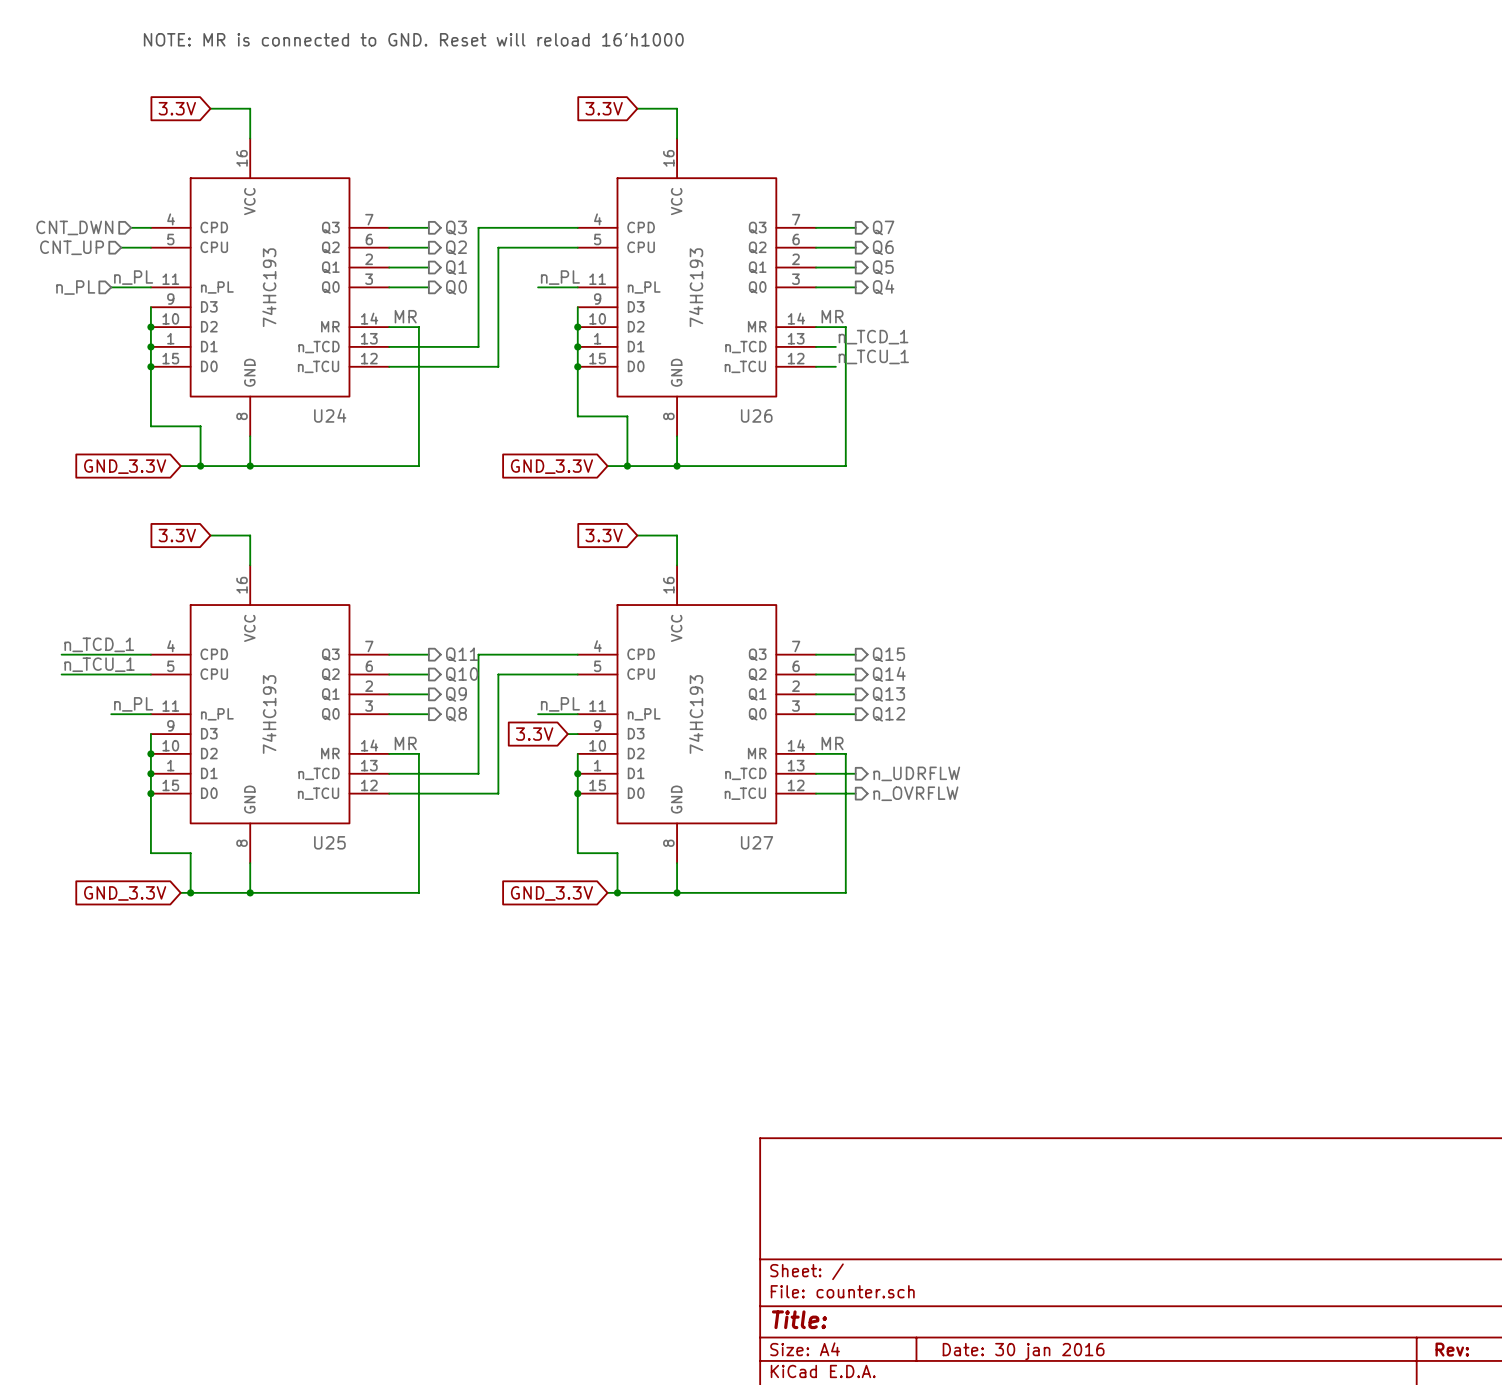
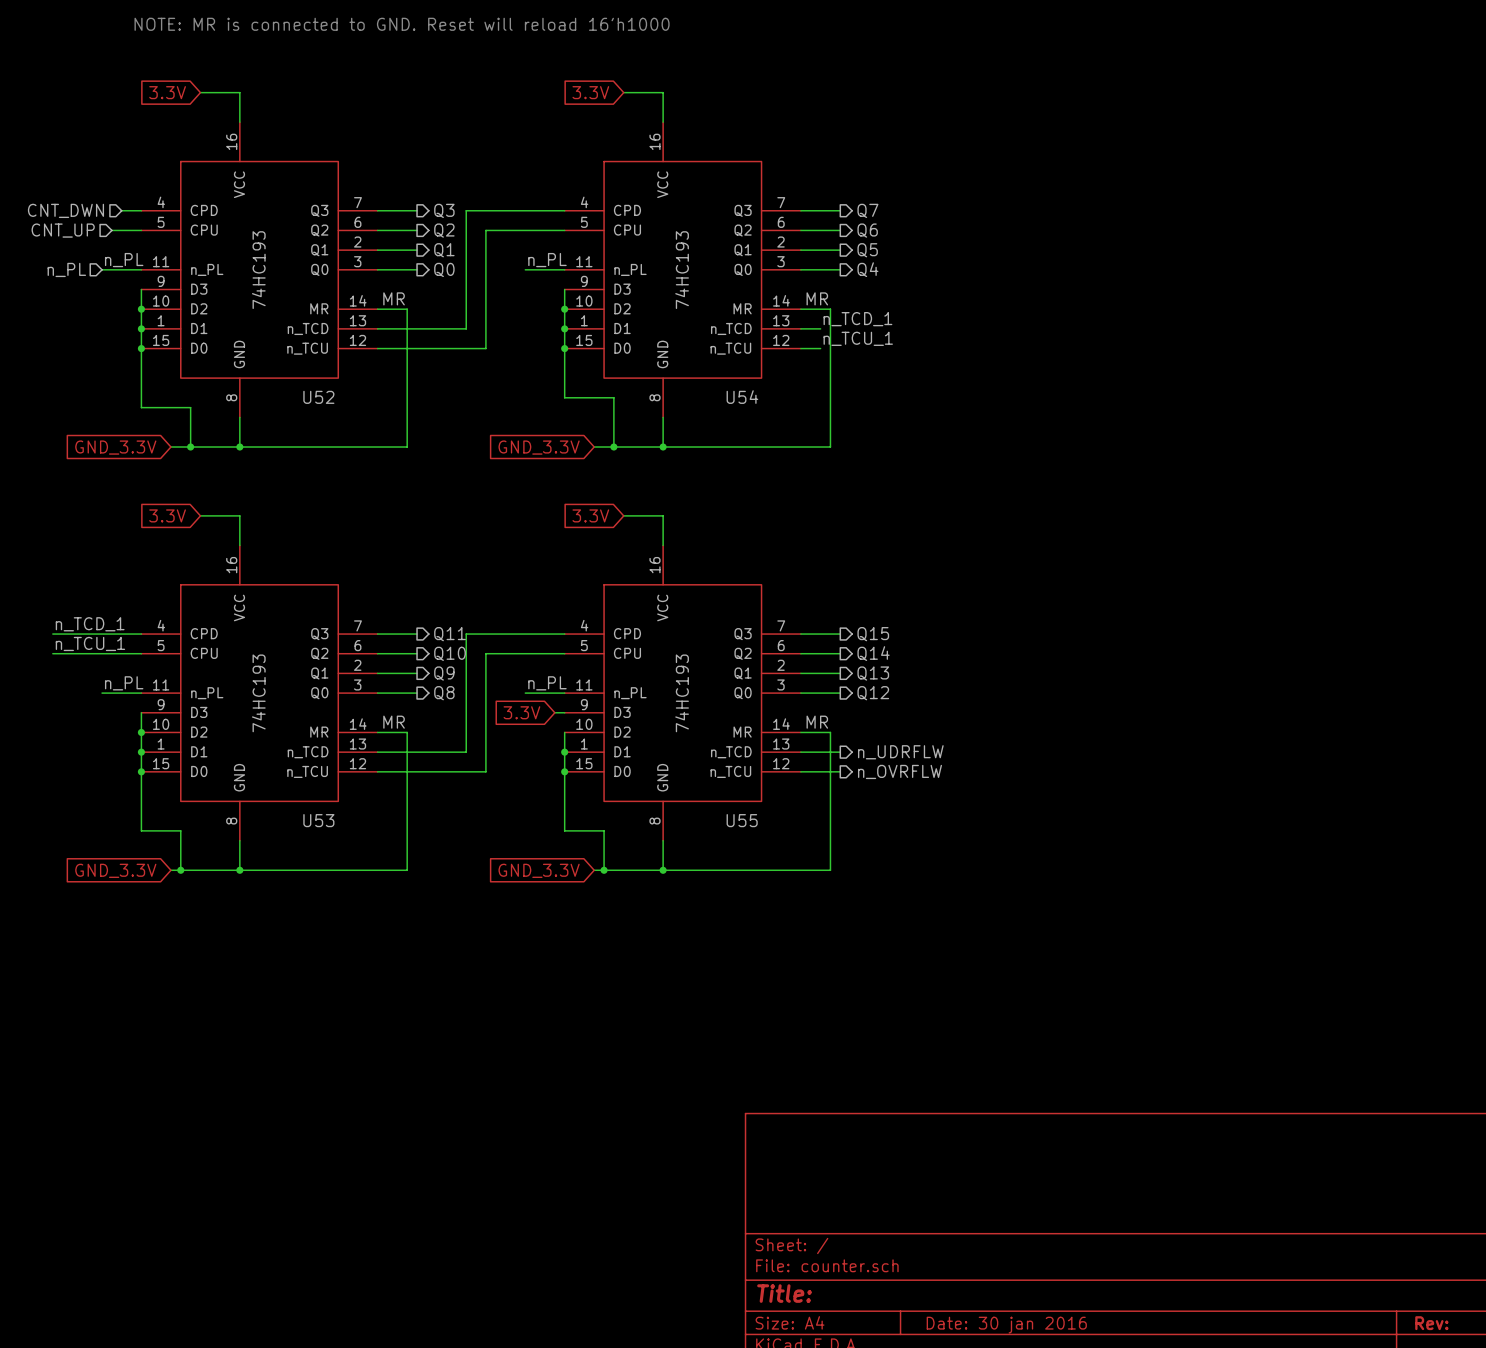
U24 name: U24 (330, 415) -> U52 (318, 397)
U26 name: U26 (756, 415) -> U54 (742, 397)
U25 name: U25 (329, 842) -> U53 (318, 820)
U27 name: U27 (757, 842) -> U55 (742, 820)

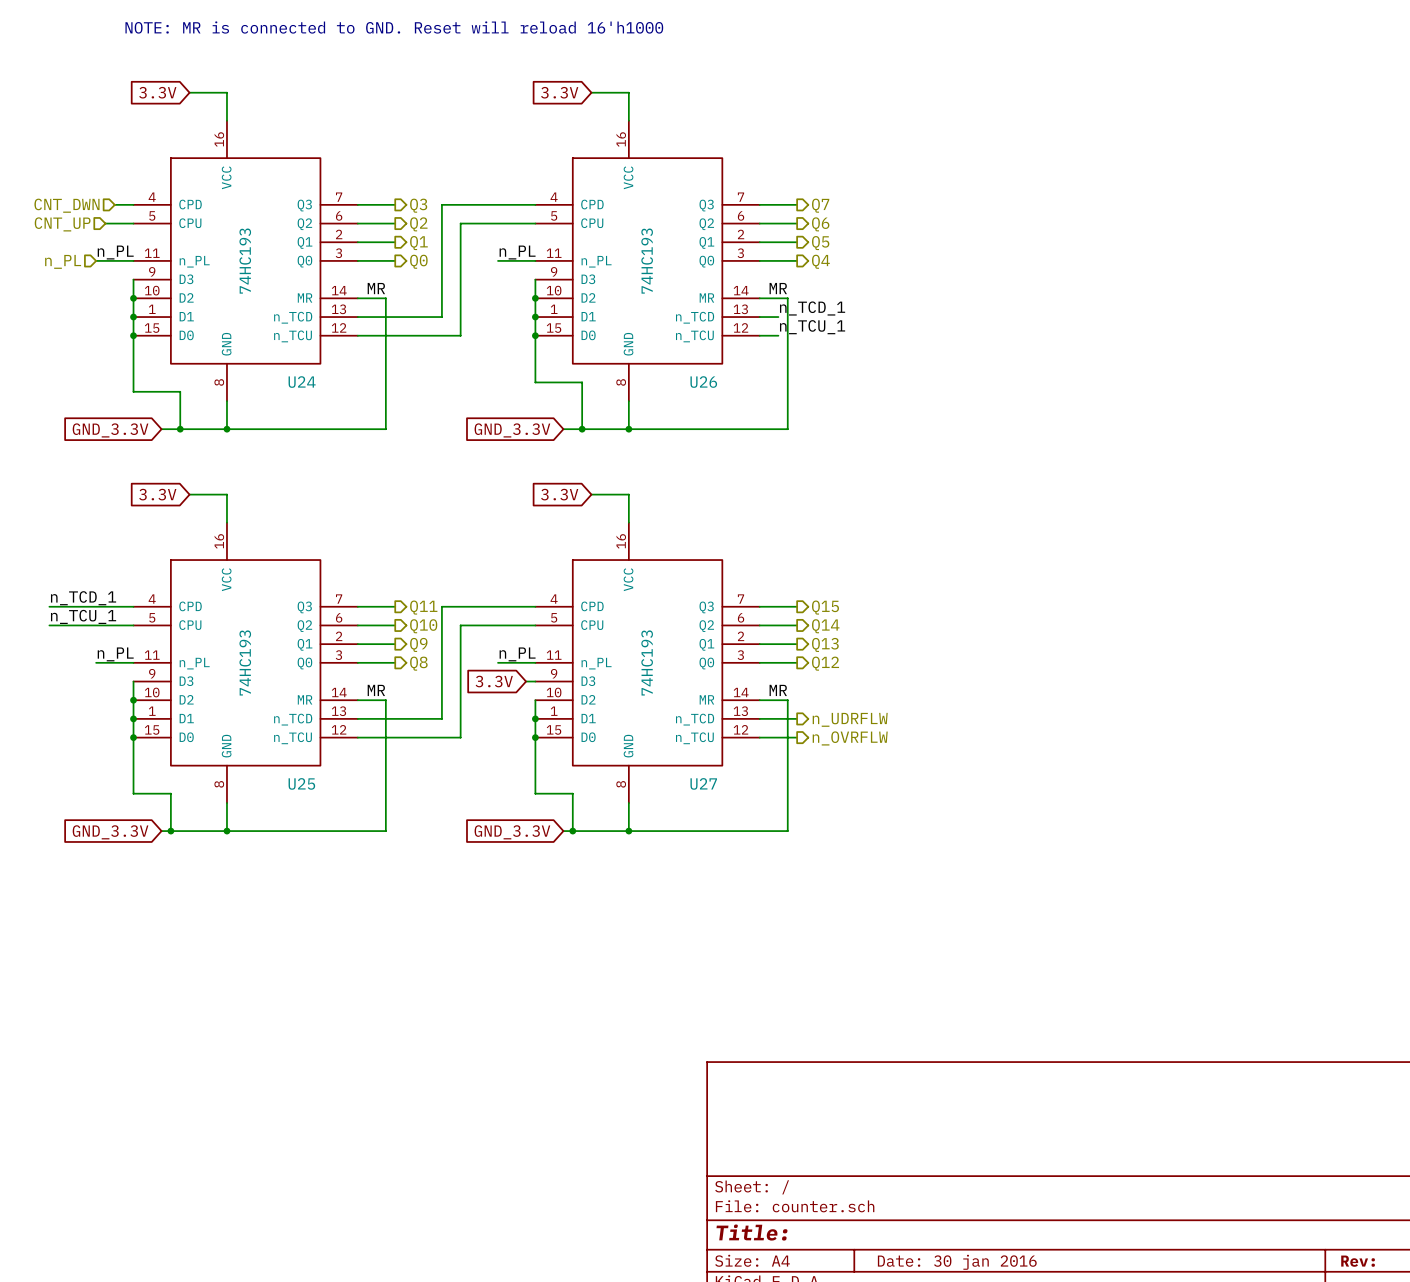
U52 name: U52 (318, 397) -> U24 (302, 382)
U54 name: U54 (742, 397) -> U26 (703, 382)
U53 name: U53 (318, 820) -> U25 (301, 783)
U55 name: U55 (742, 820) -> U27 (703, 783)

